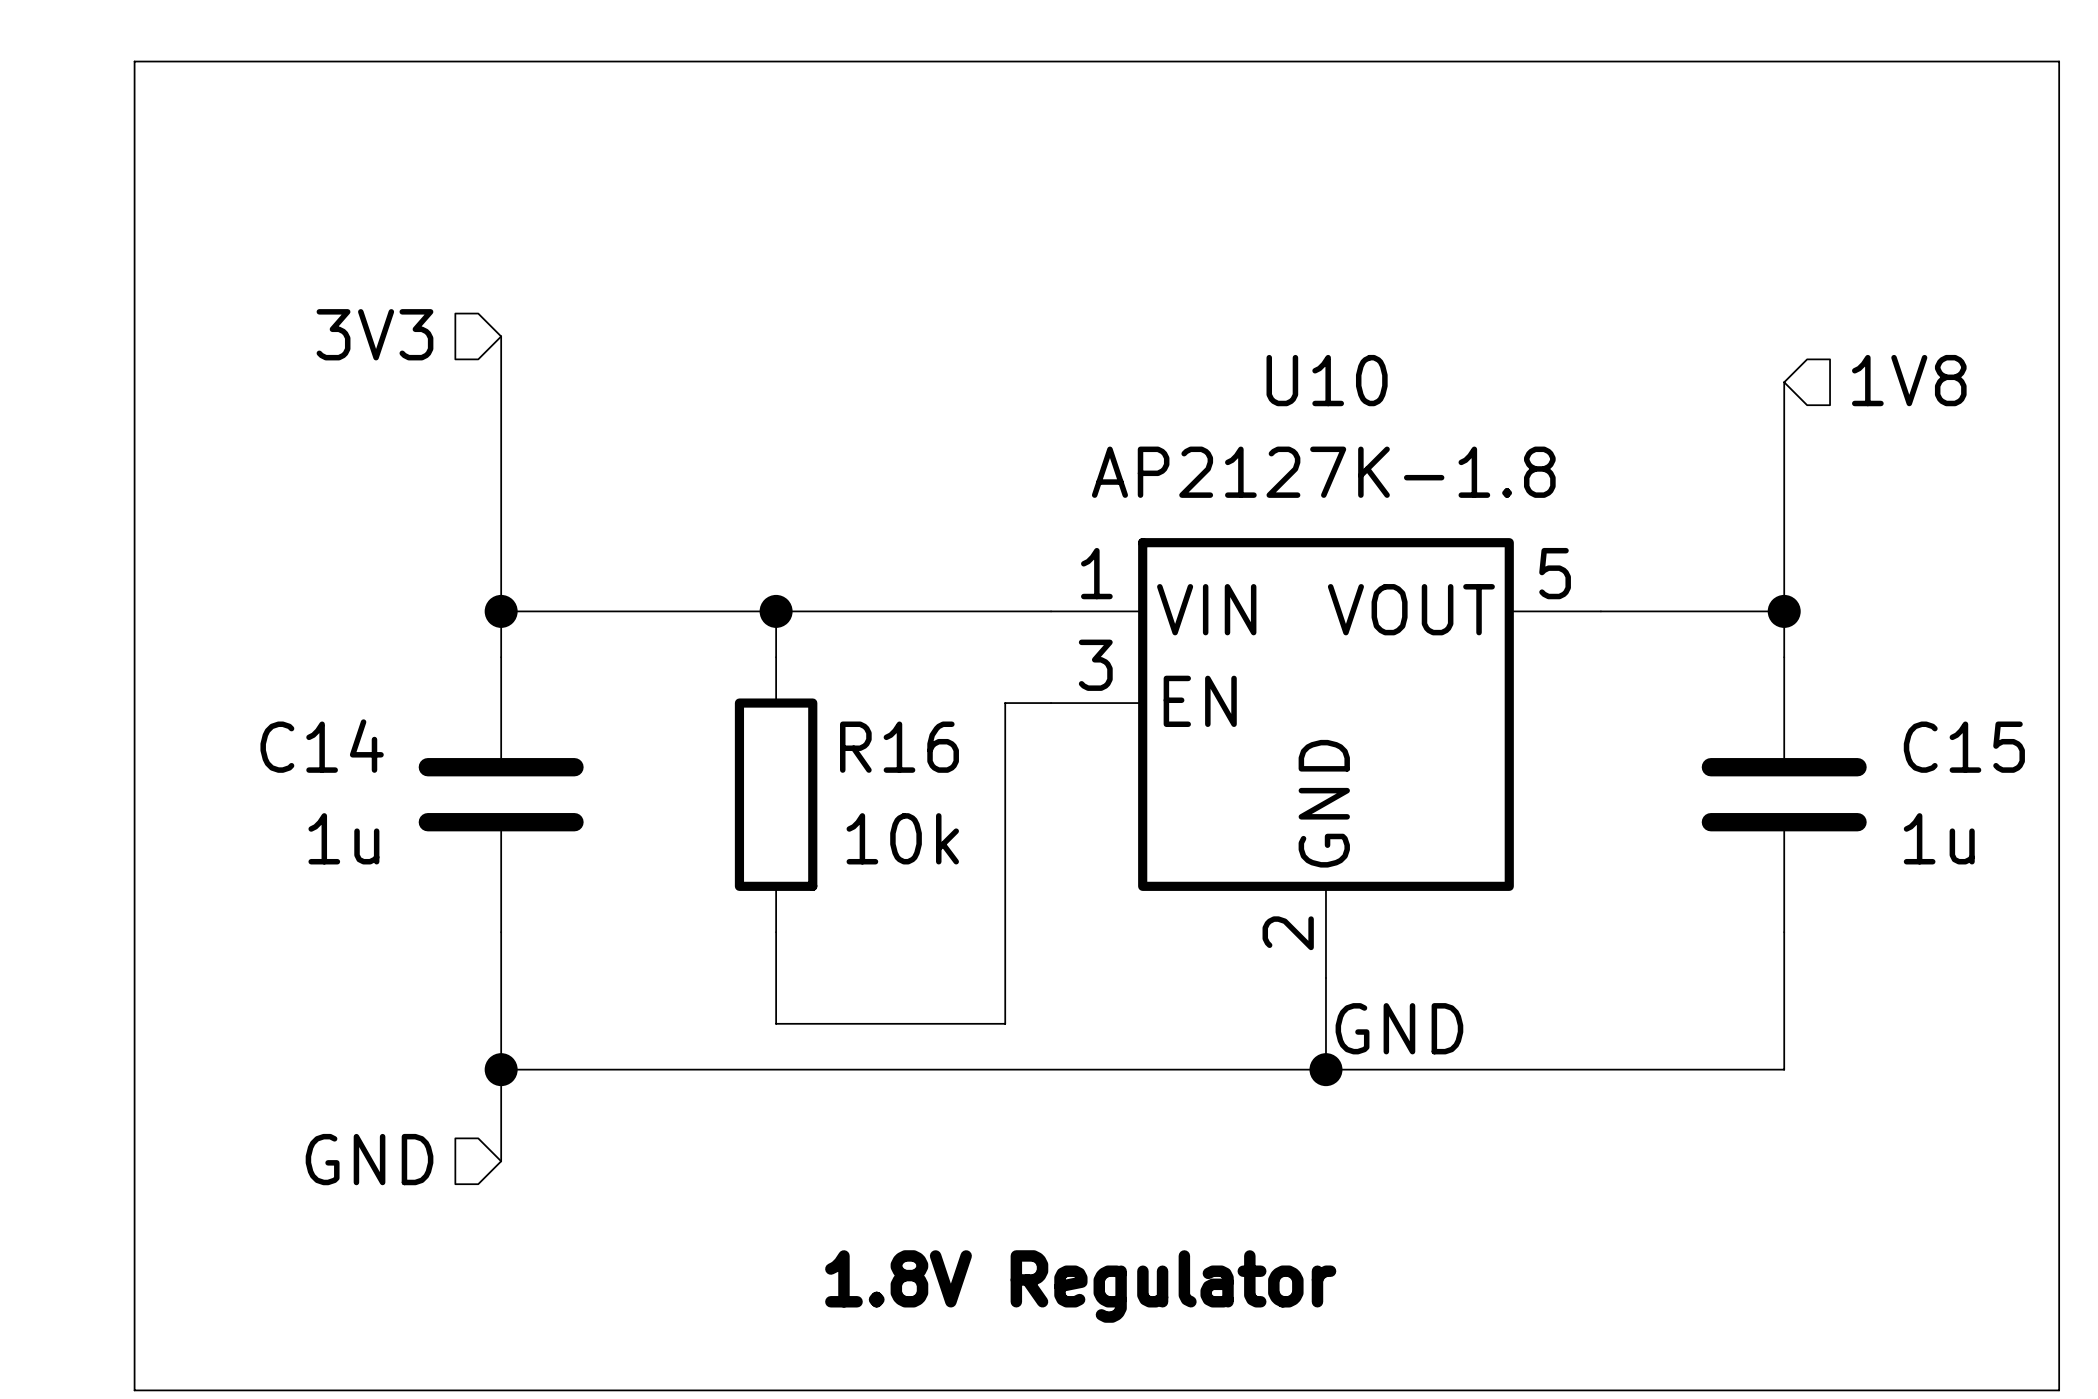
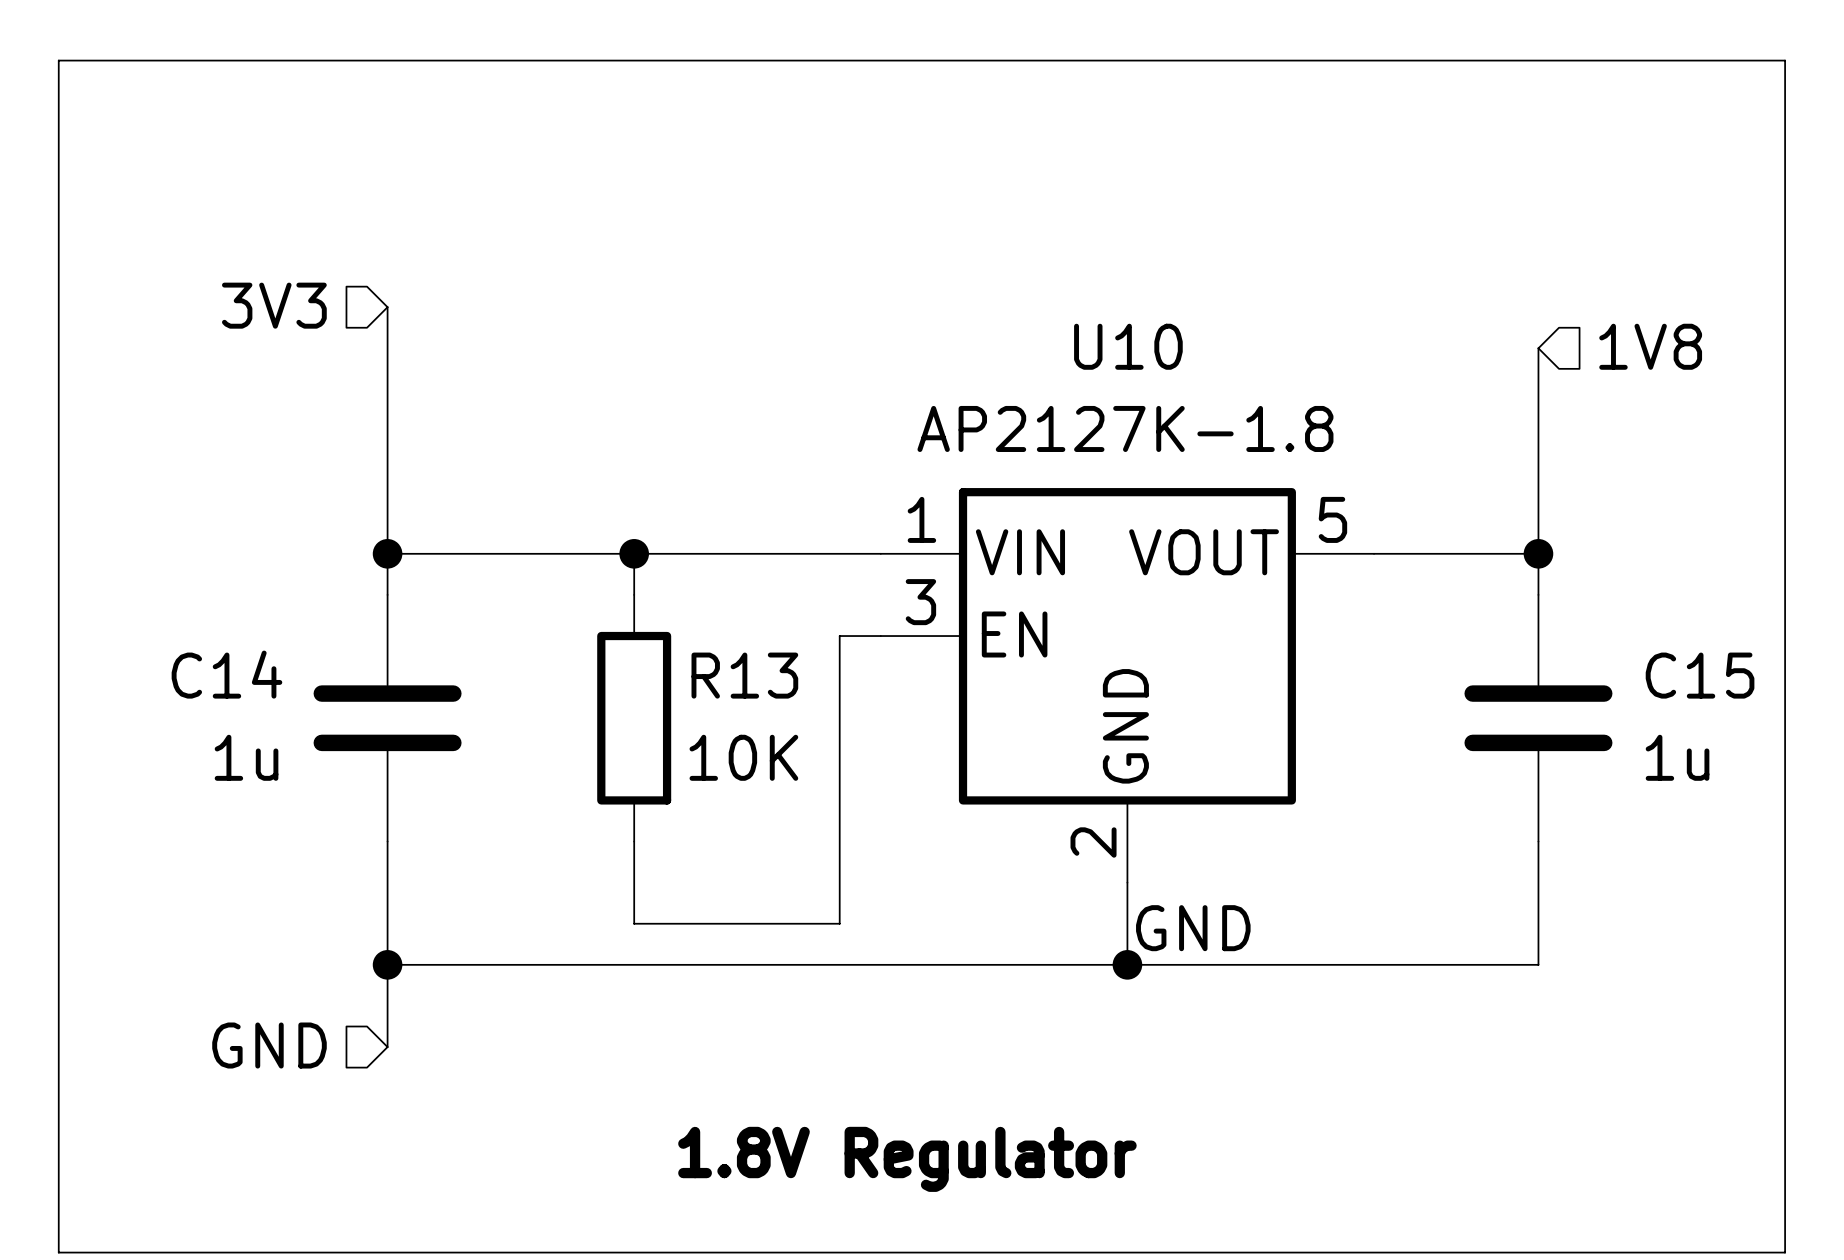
R16 name: R16 (899, 747) -> R13 (744, 675)
R16 value: 10k (902, 838) -> 10K (743, 757)

